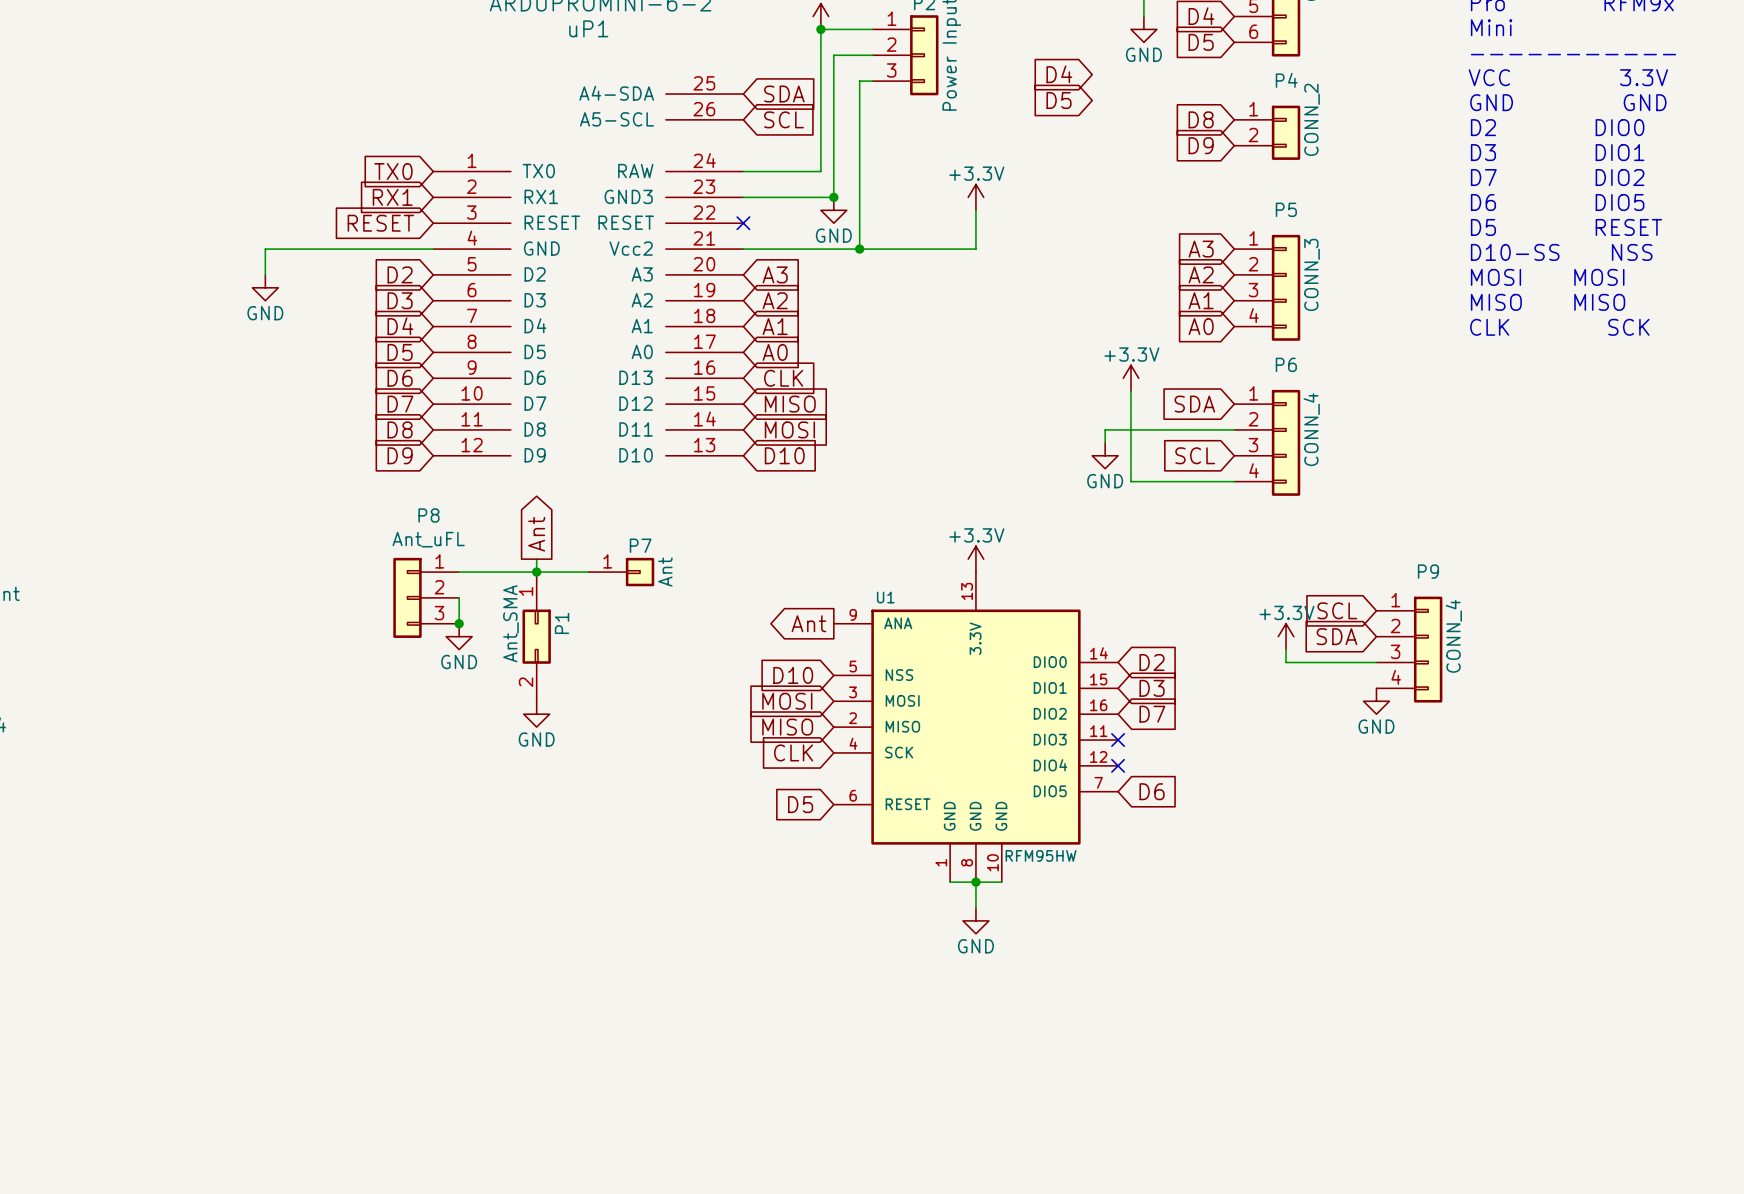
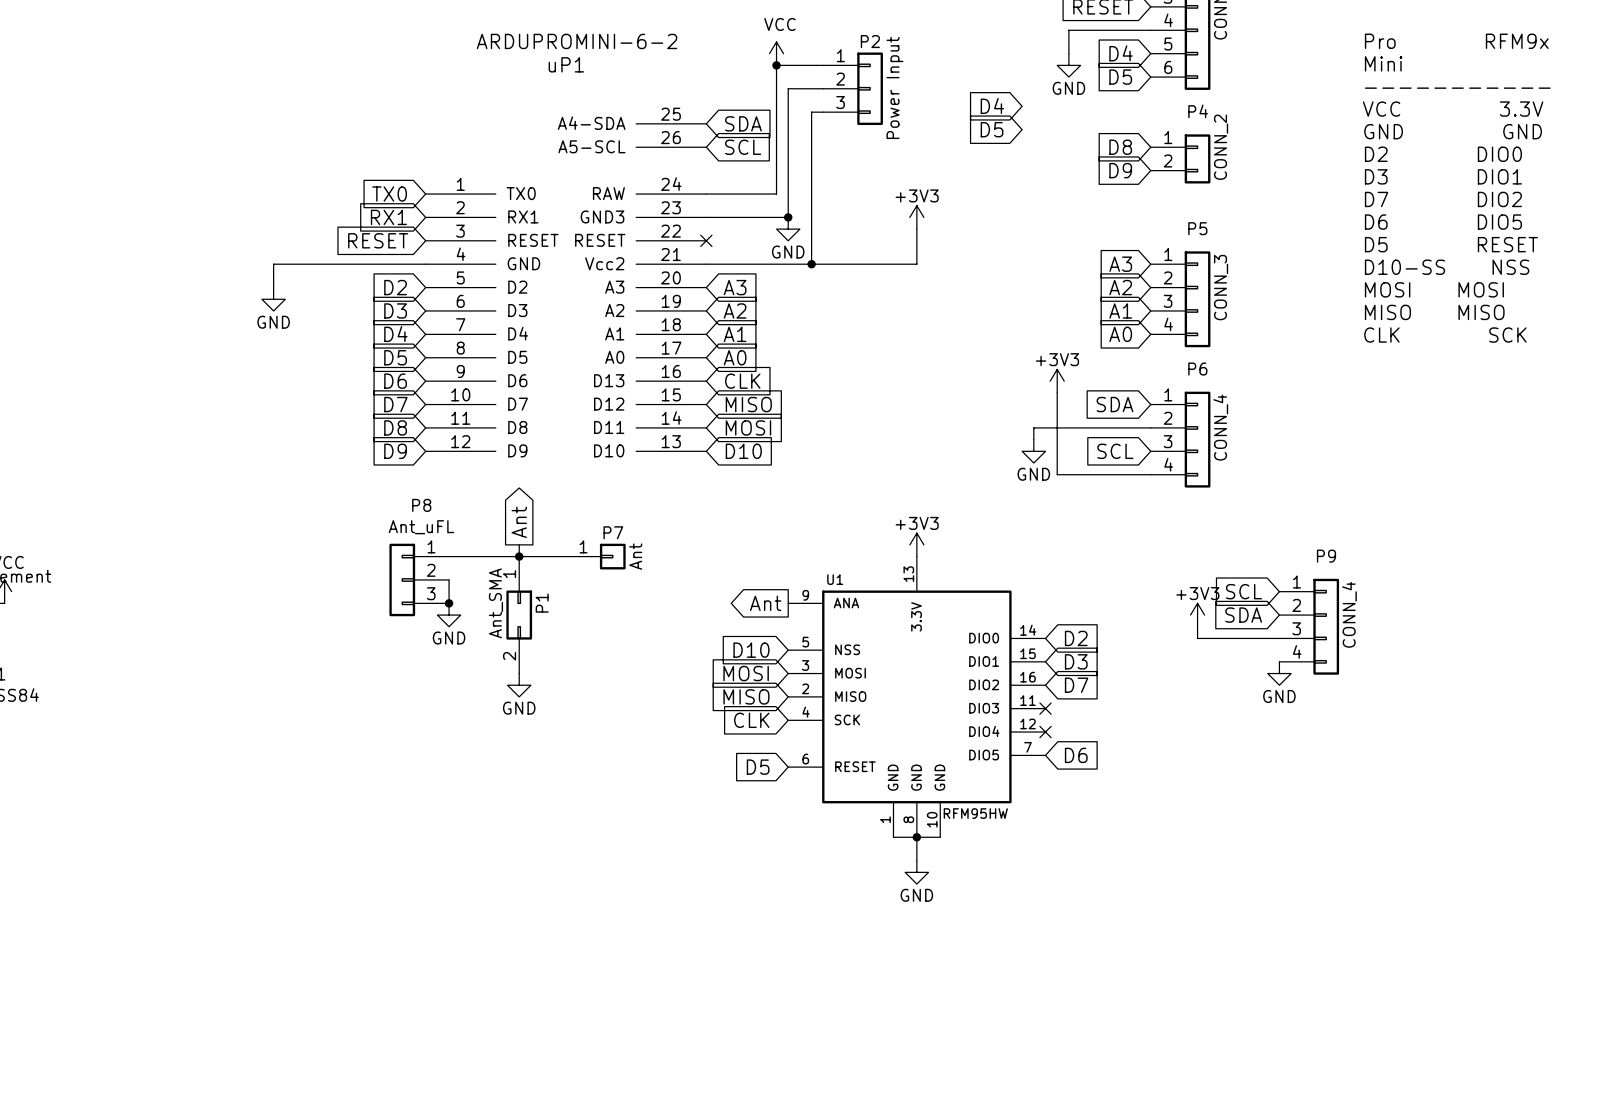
power symbol: +3.3V (975, 197) -> +3V3 (916, 217)
power symbol: +3.3V (1130, 378) -> +3V3 (1057, 381)
power symbol: +3.3V (975, 559) -> +3V3 (916, 544)
power symbol: +3.3V (1286, 636) -> +3V3 (1197, 615)

